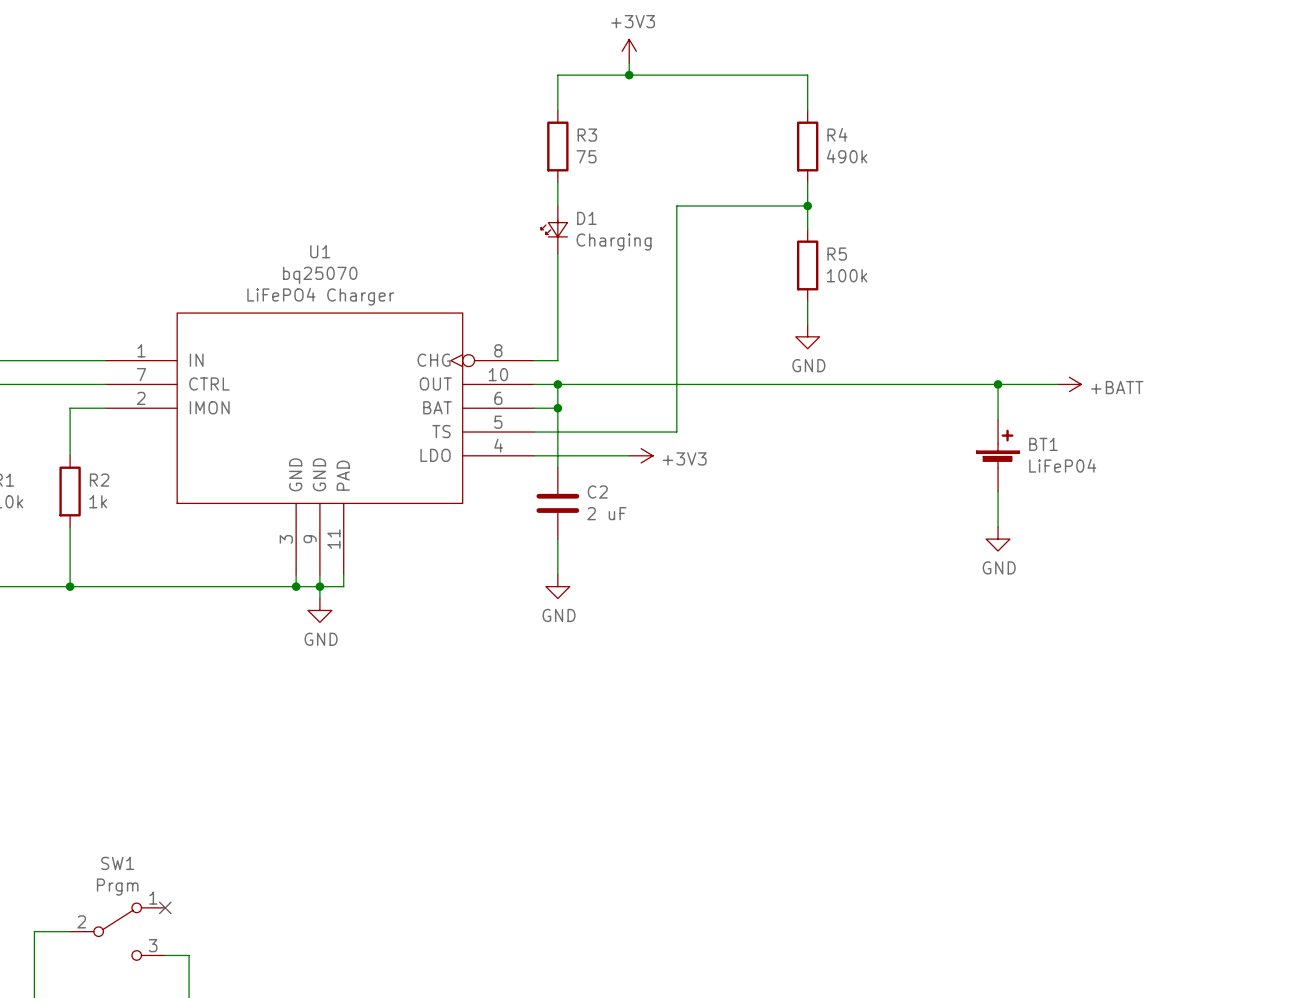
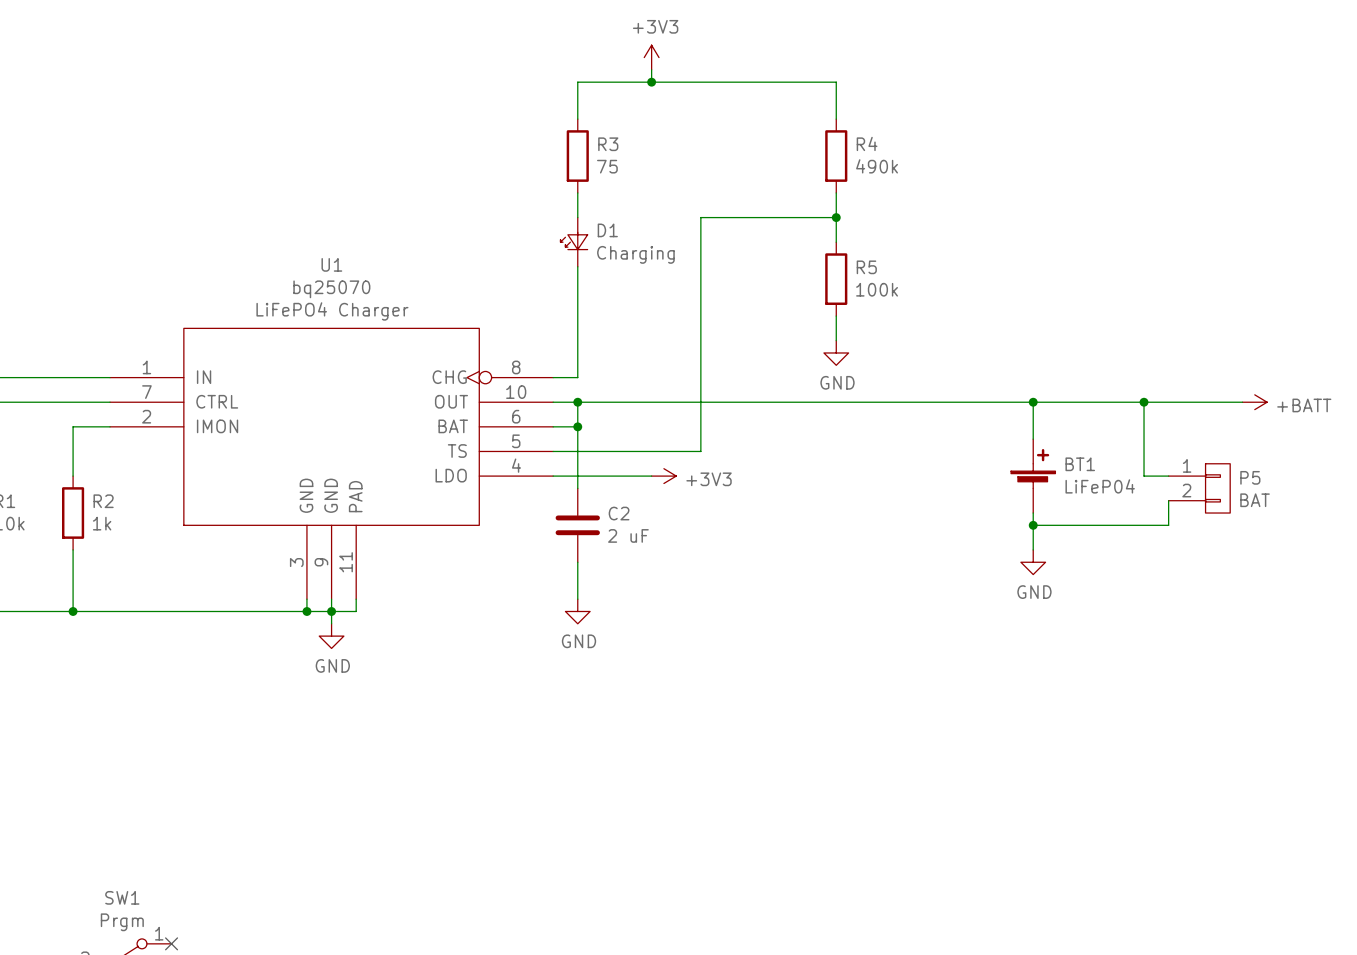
wire: none -> (1094, 402) (1242, 402)
power symbol position: +BATT (1069, 384) -> +BATT (1254, 402)
wire: none -> (1144, 402) (1144, 476) (1168, 476)
junction: none -> (1144, 402)
P5: none -> BAT (1199, 488)
wire: none -> (1168, 500) (1168, 525) (1033, 525)
junction: none -> (1033, 525)

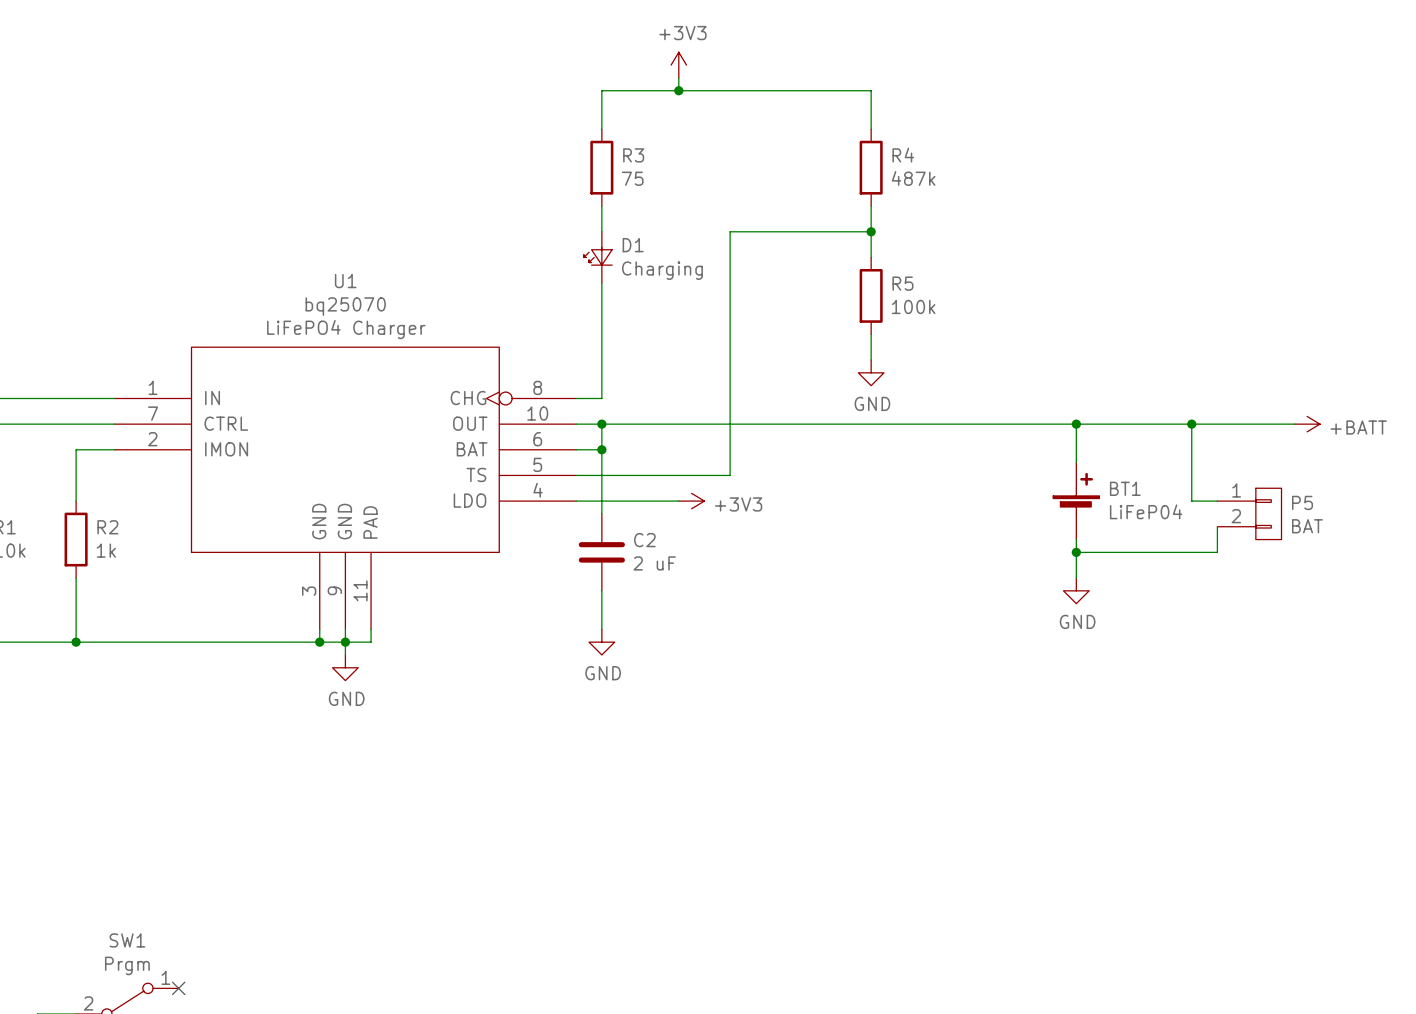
R4 value: 490k (877, 166) -> 487k (913, 178)

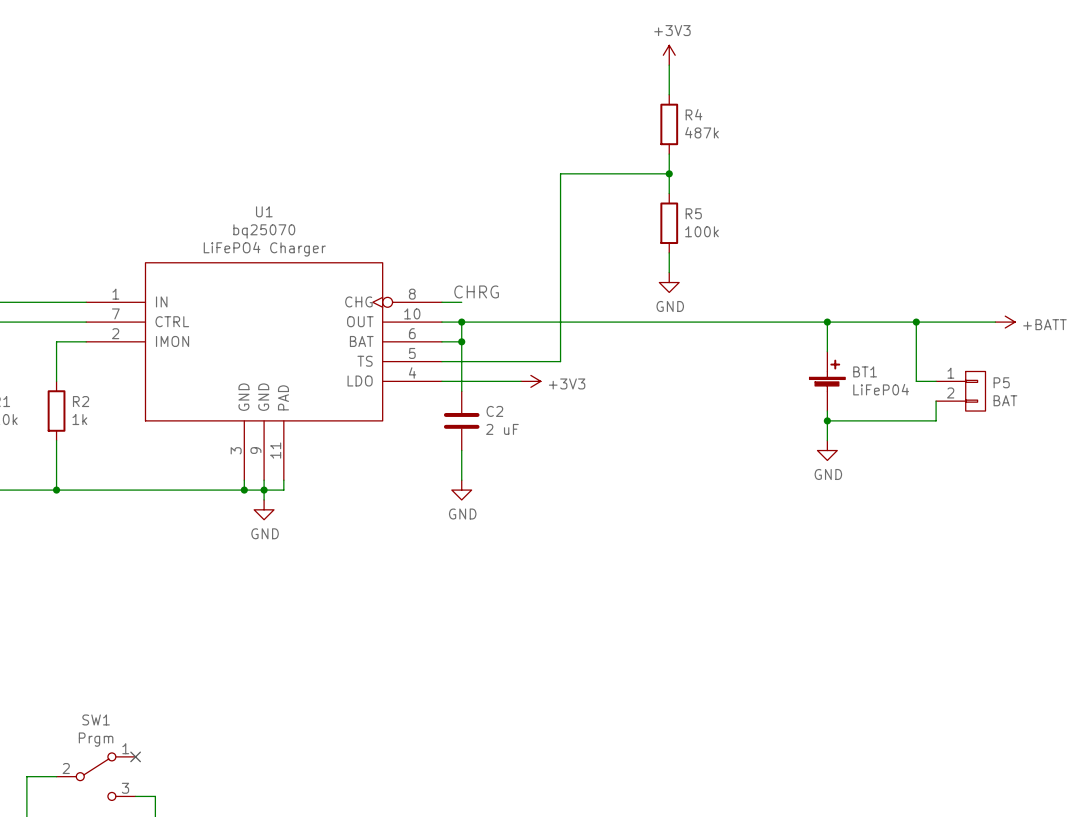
power symbol position: +3V3 (678, 65) -> +3V3 (669, 55)
wire: (678, 77) (678, 90) -> none
junction: (678, 90) -> none
wire: (871, 90) (601, 90) (601, 129) -> none
R3: 75 (601, 167) -> none
wire: (601, 206) (601, 231) -> none
D1: Charging (598, 257) -> none
wire: (601, 283) (601, 398) -> none
label: none -> CHRG (476, 291)

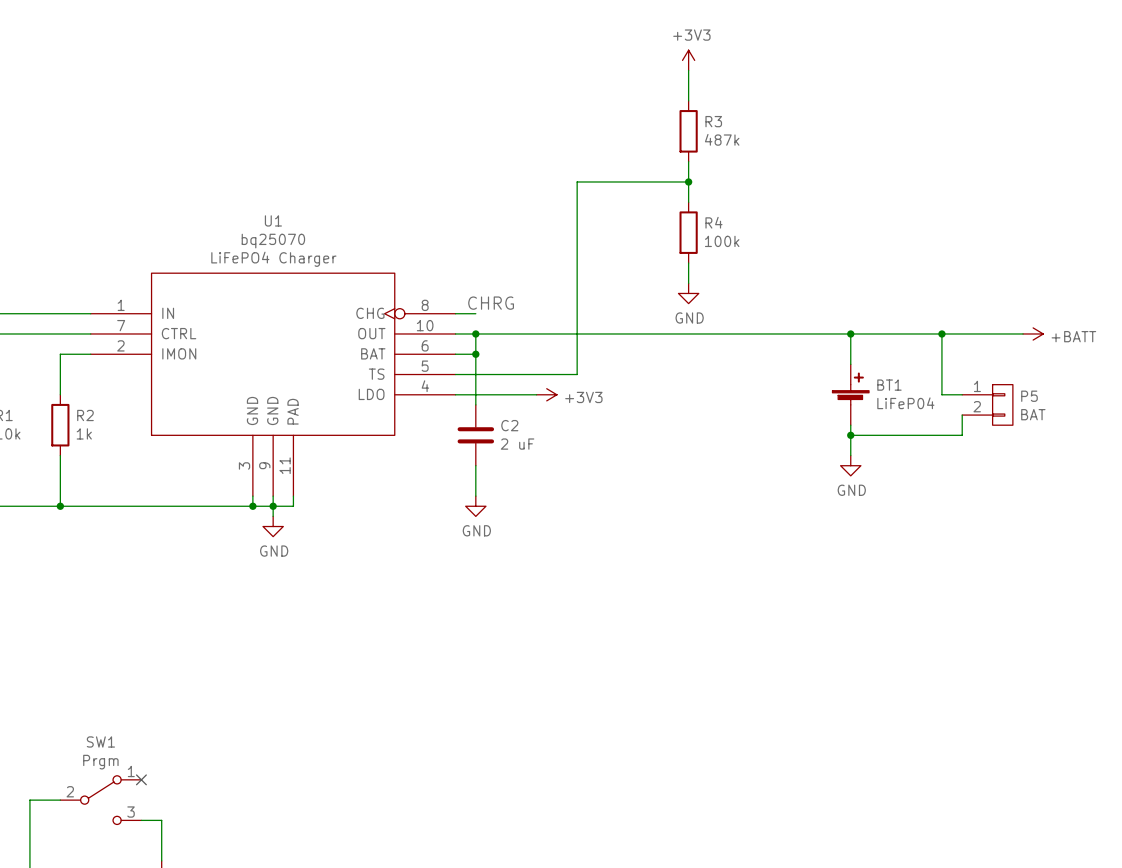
R4 name: R4 (693, 114) -> R3 (713, 121)
R5 name: R5 (693, 213) -> R4 (713, 222)

